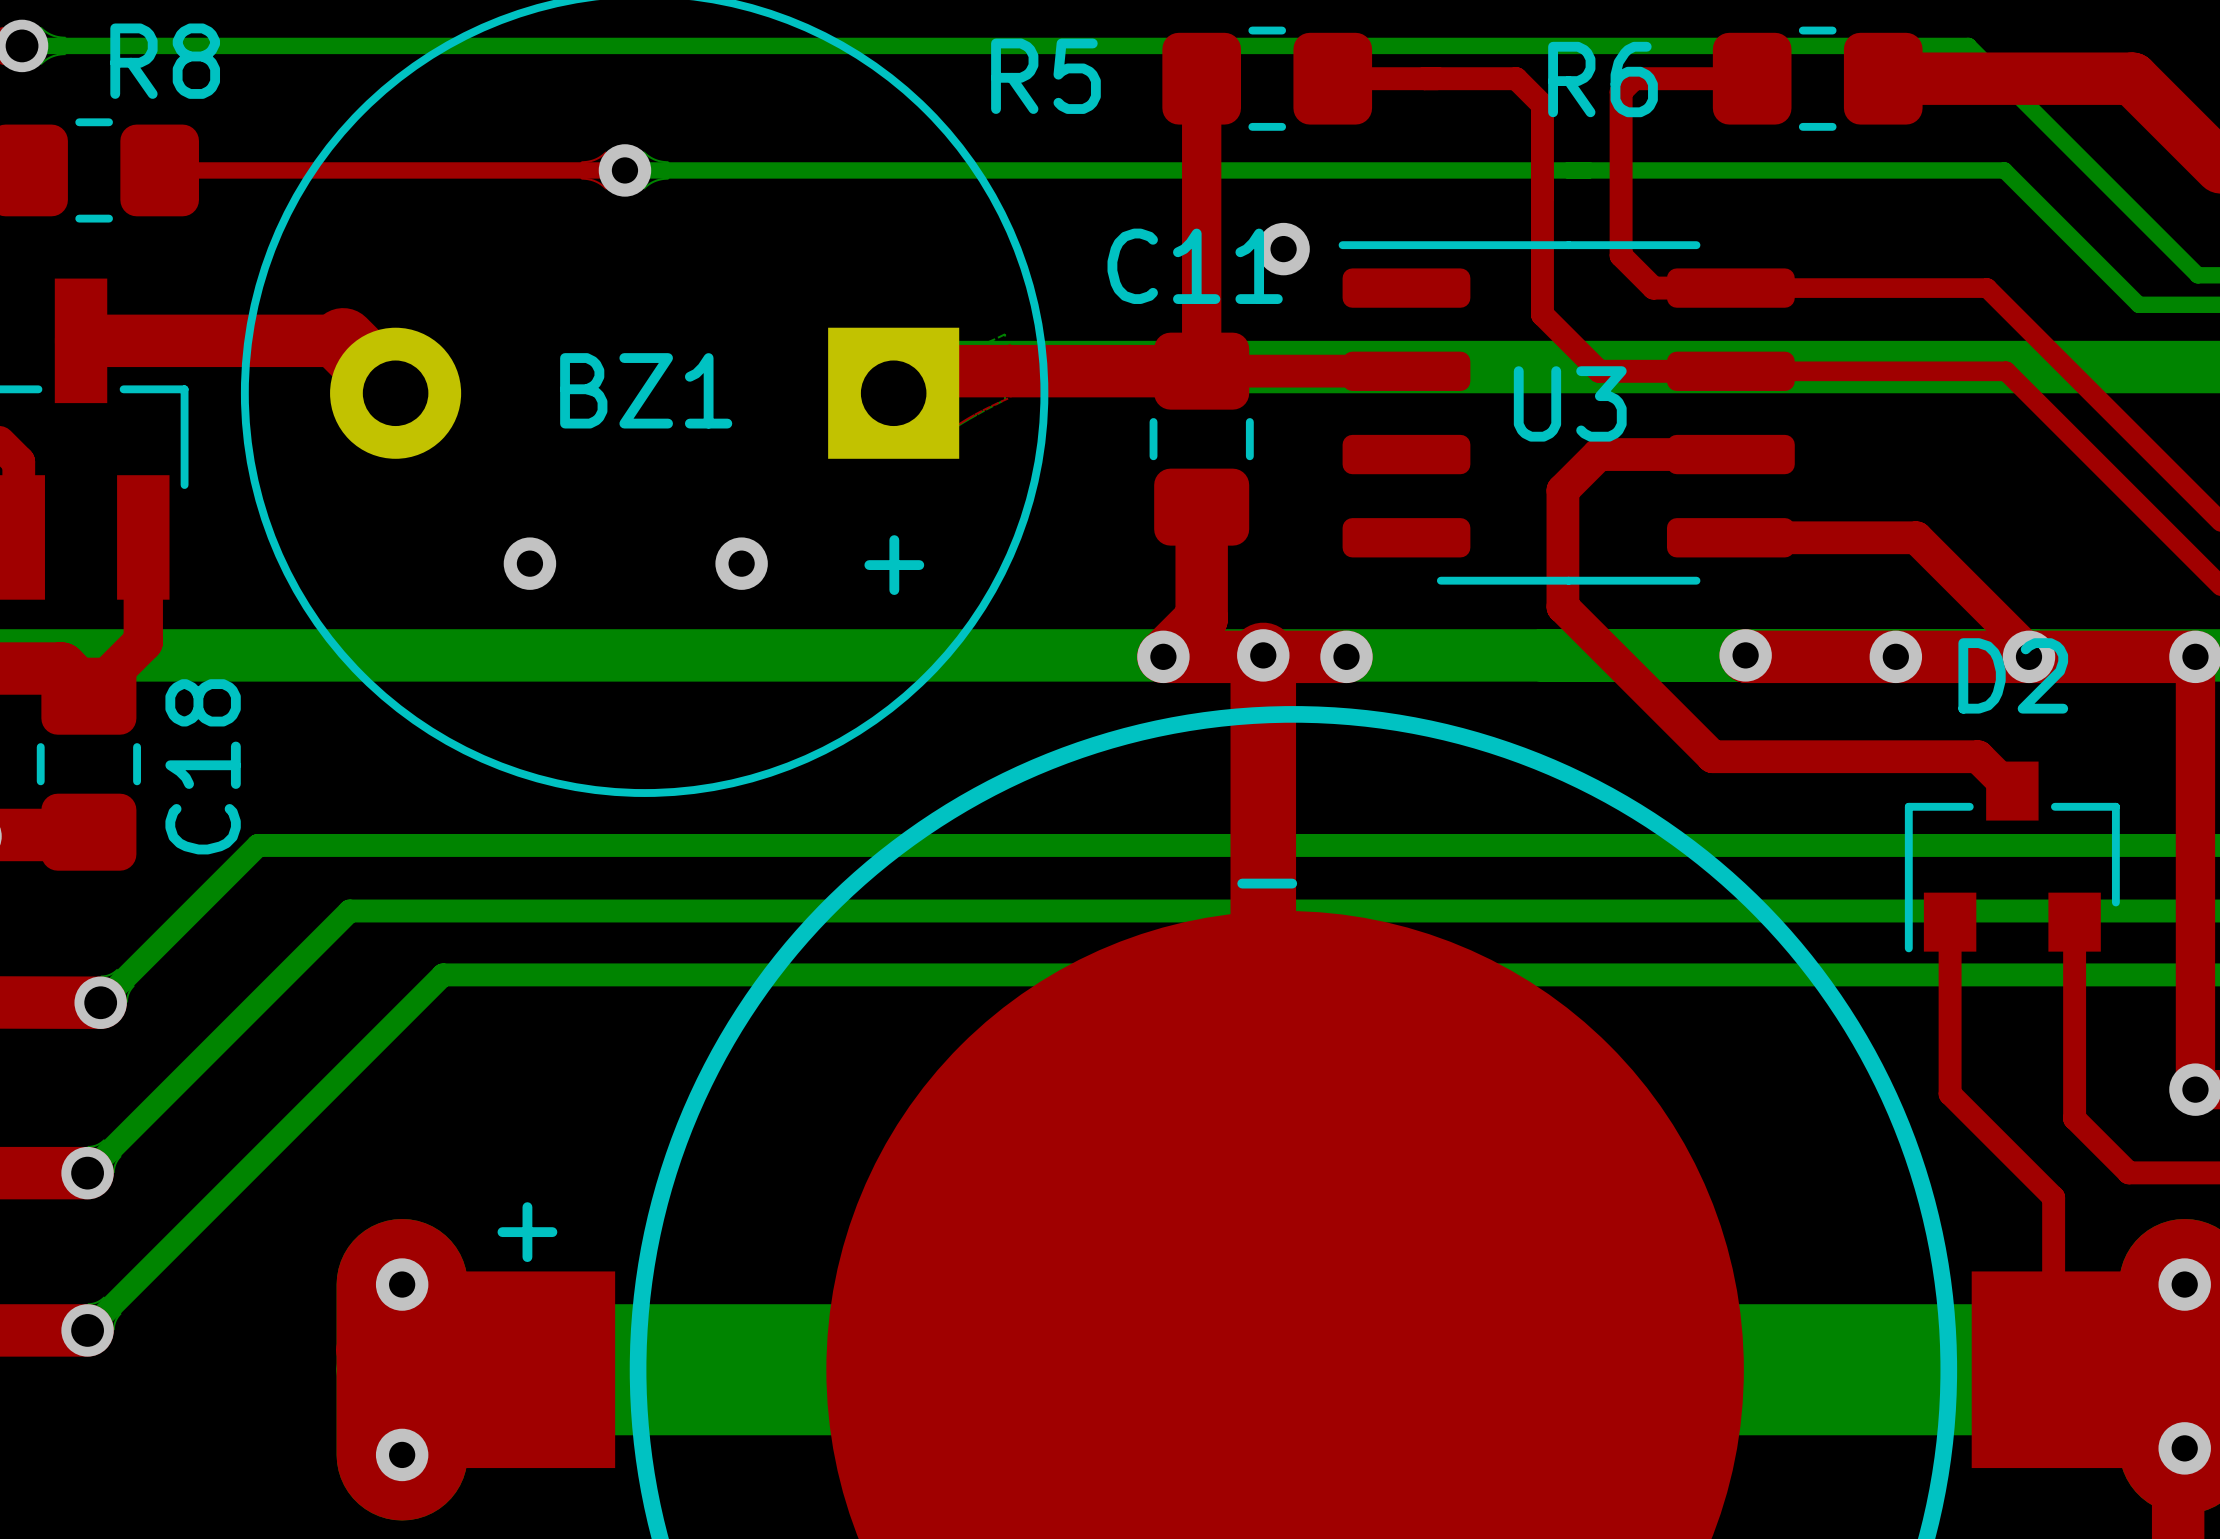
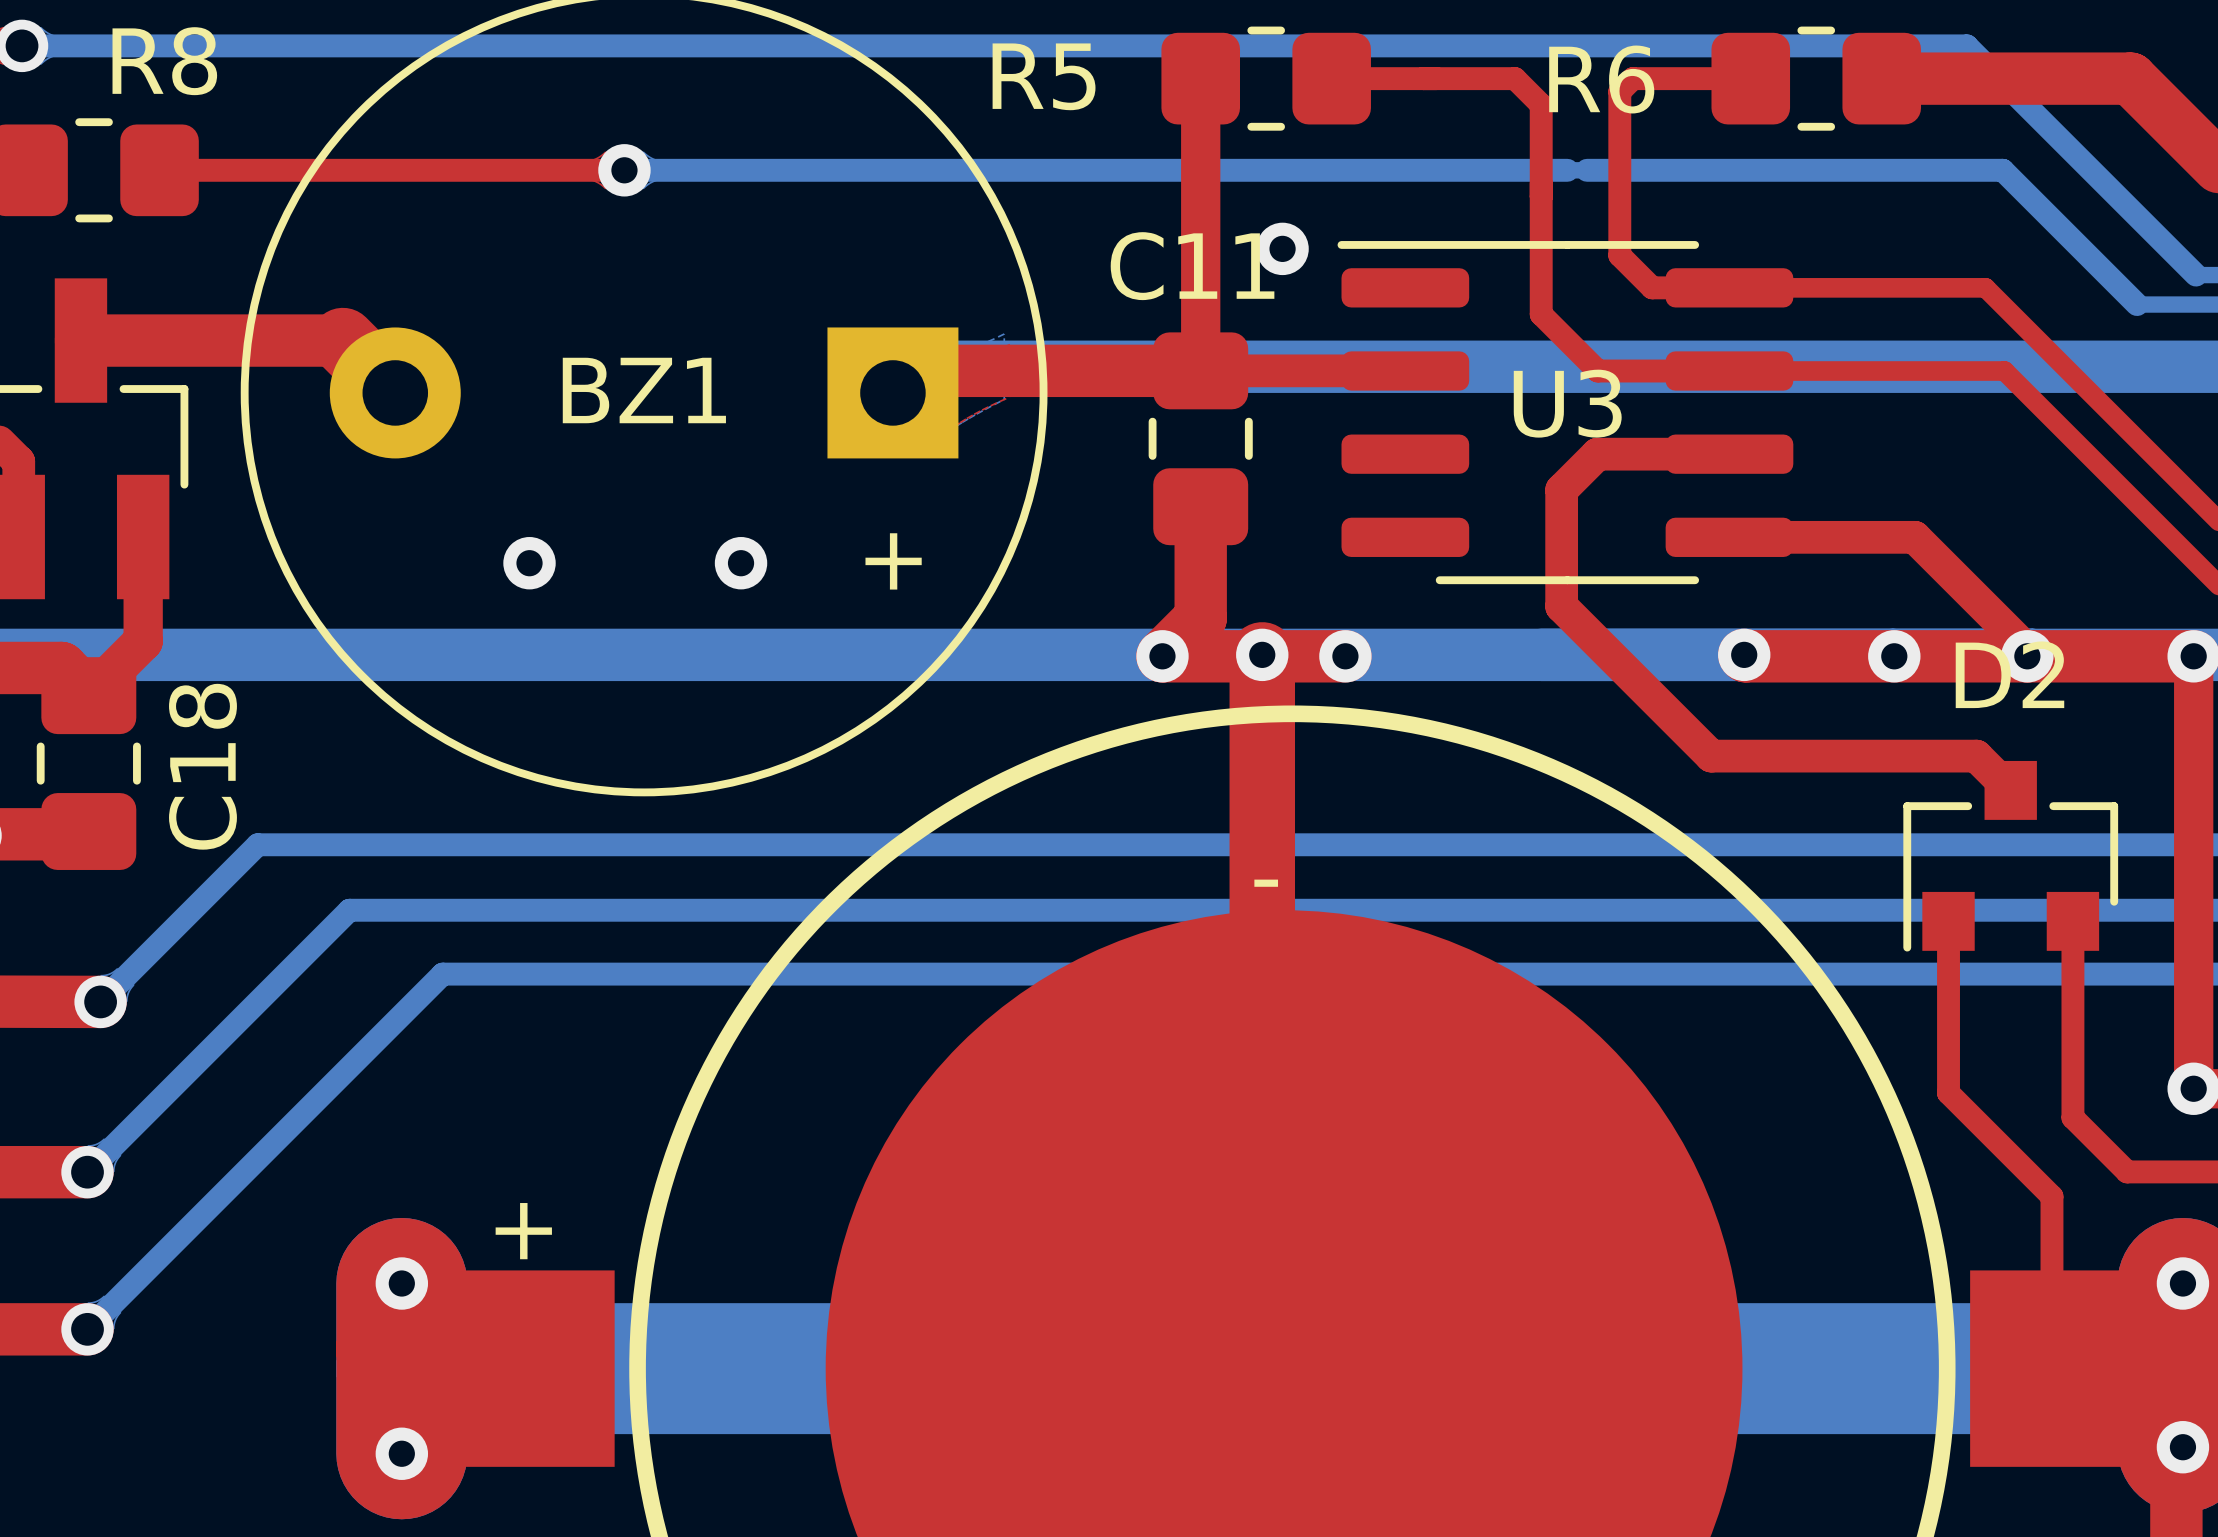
bottom track width: thin (22, 45) (1968, 45) (2197, 275) -> thick (22, 45) (1966, 45) (2196, 275)
top track width: thin (159, 170) (624, 170) -> thick (159, 170) (624, 170)
bottom track width: thin (624, 170) (1568, 170) -> thick (624, 170) (1567, 170)
bottom track width: thin (1588, 170) (2004, 170) (2138, 304) -> thick (1587, 170) (2002, 170) (2137, 304)

